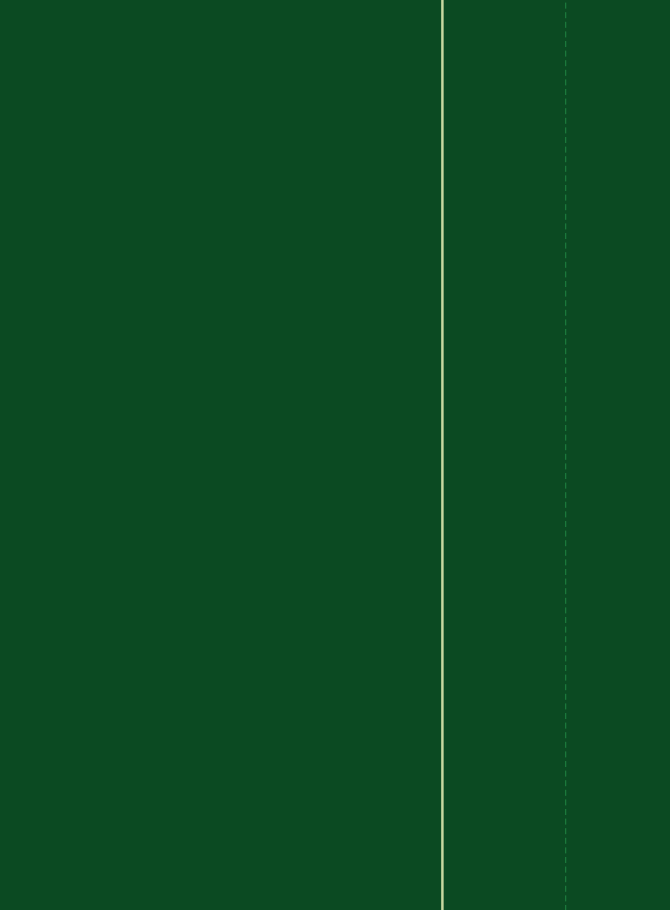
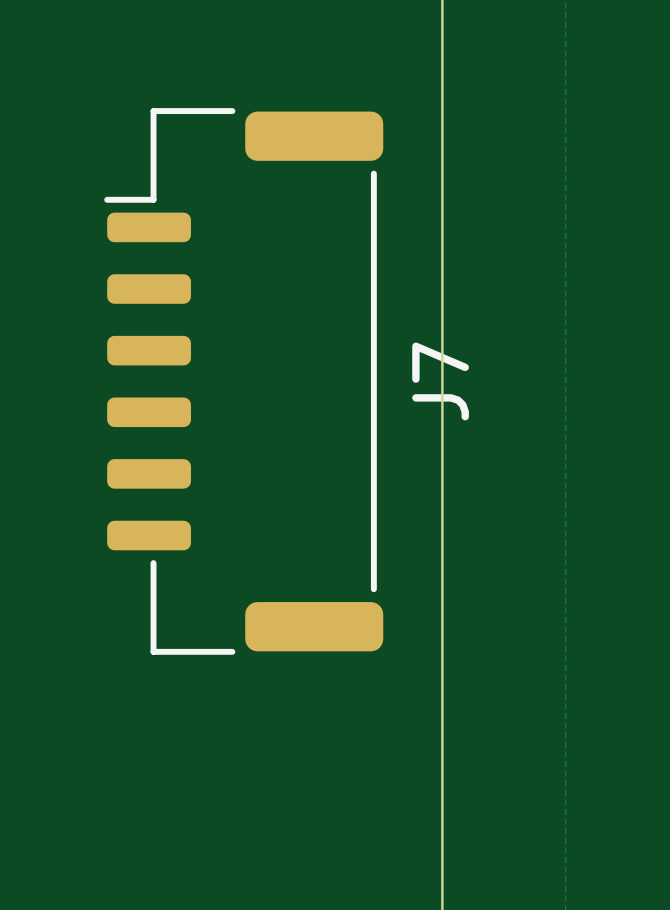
J7: none -> (243, 381)

